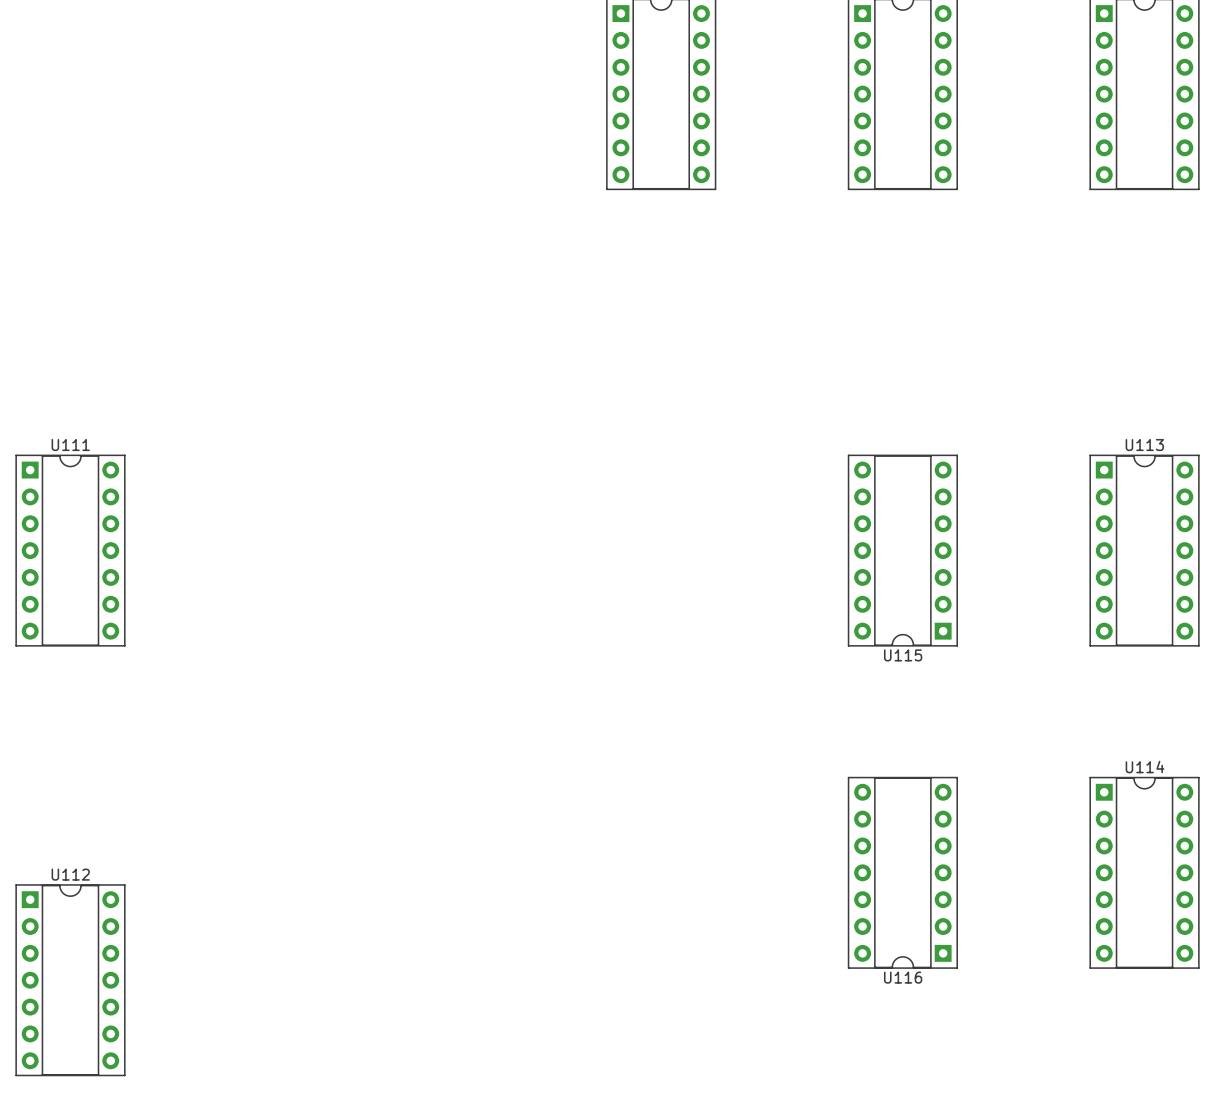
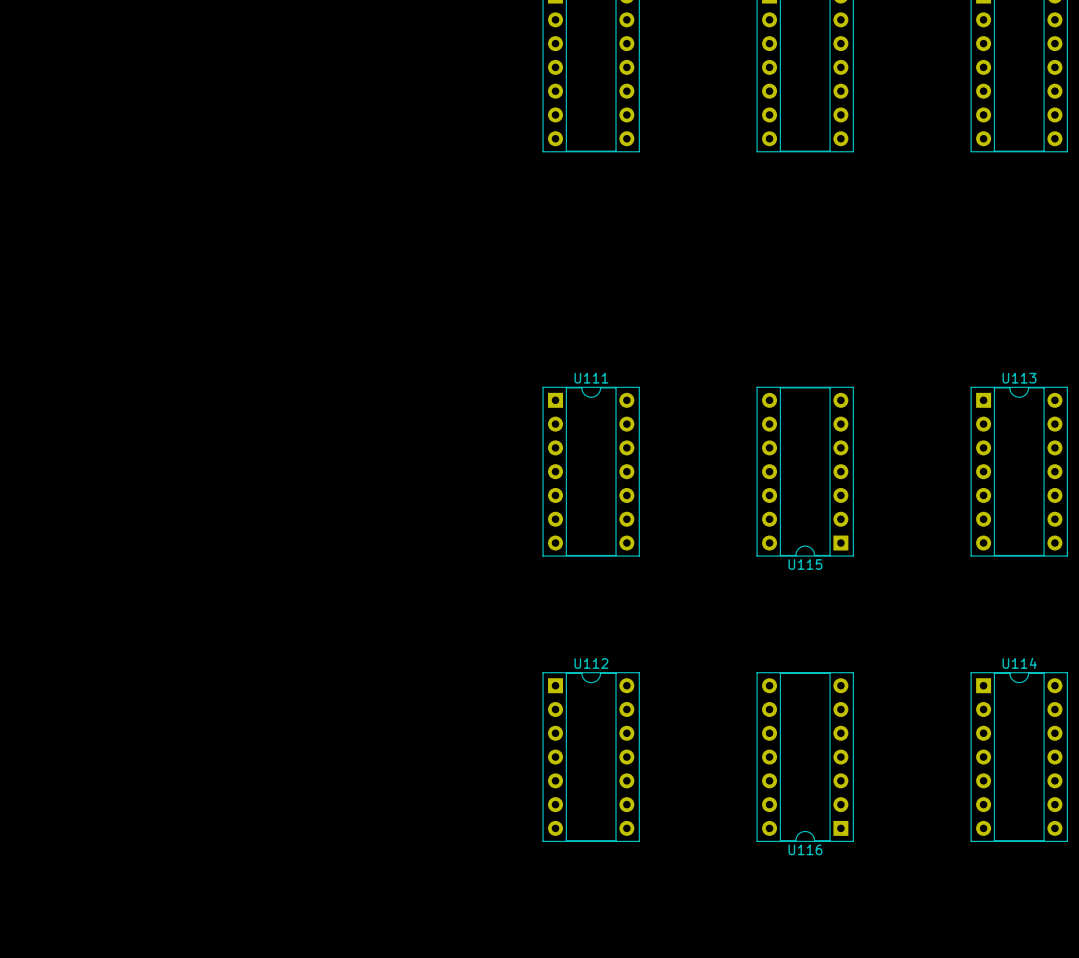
U111 position: (70, 550) -> (591, 471)
U112 position: (70, 980) -> (591, 757)

